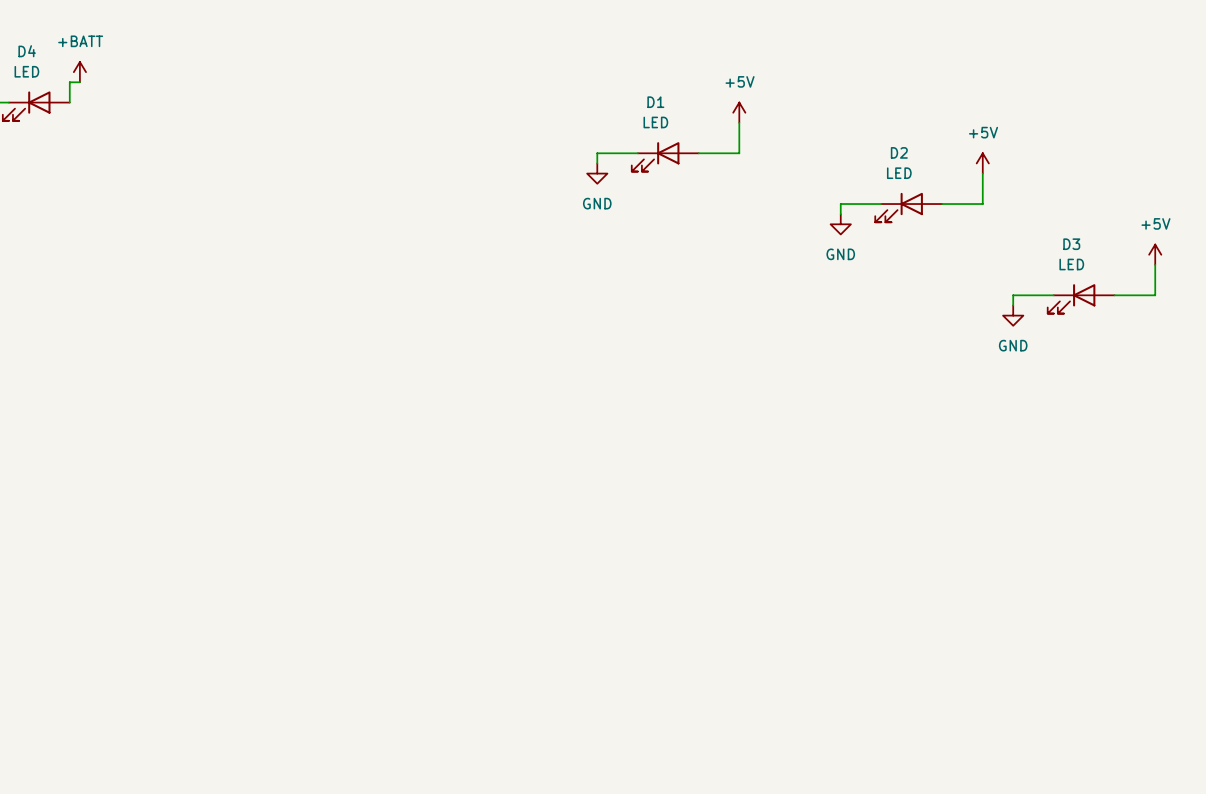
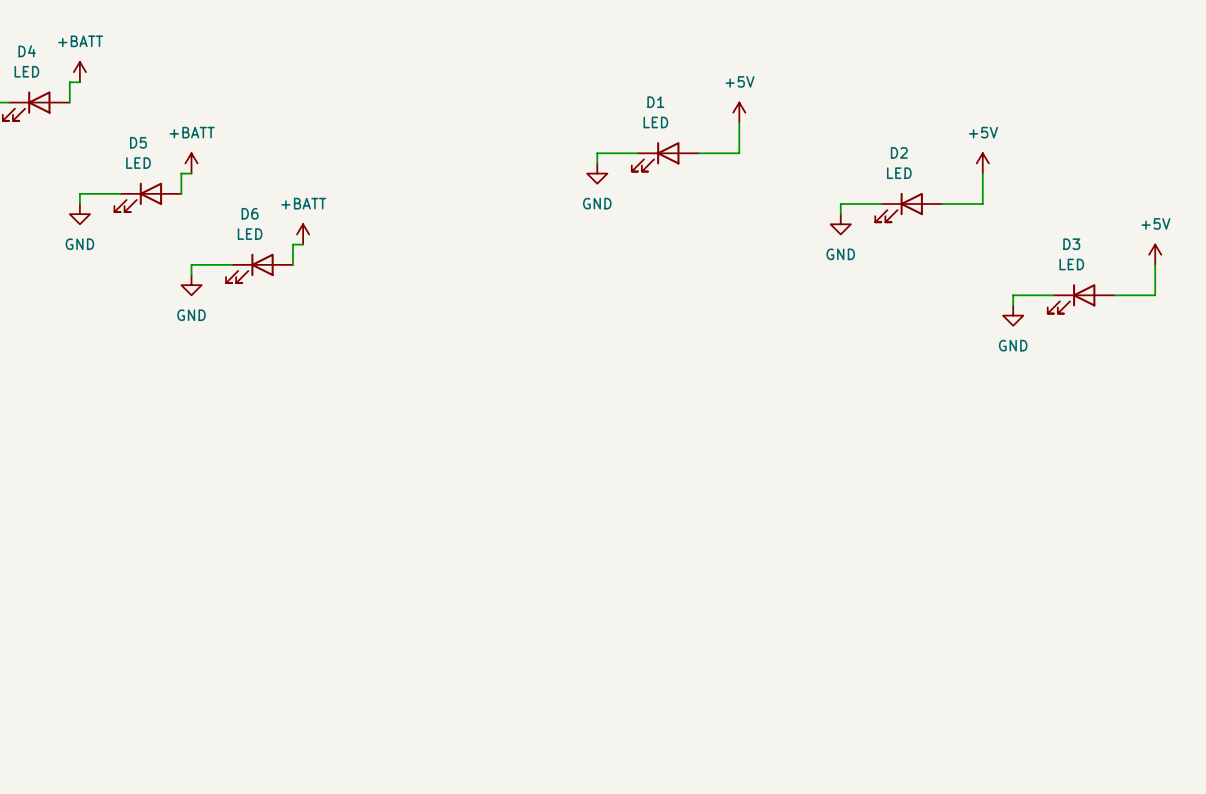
power symbol: none -> +BATT (191, 163)
wire: none -> (191, 173) (181, 173) (181, 193)
wire: none -> (120, 193) (79, 193) (79, 204)
D5: none -> LED (147, 197)
power symbol: none -> GND (79, 214)
power symbol: none -> +BATT (303, 234)
wire: none -> (303, 244) (292, 244) (292, 264)
wire: none -> (232, 264) (191, 264) (191, 275)
D6: none -> LED (259, 268)
power symbol: none -> GND (191, 285)

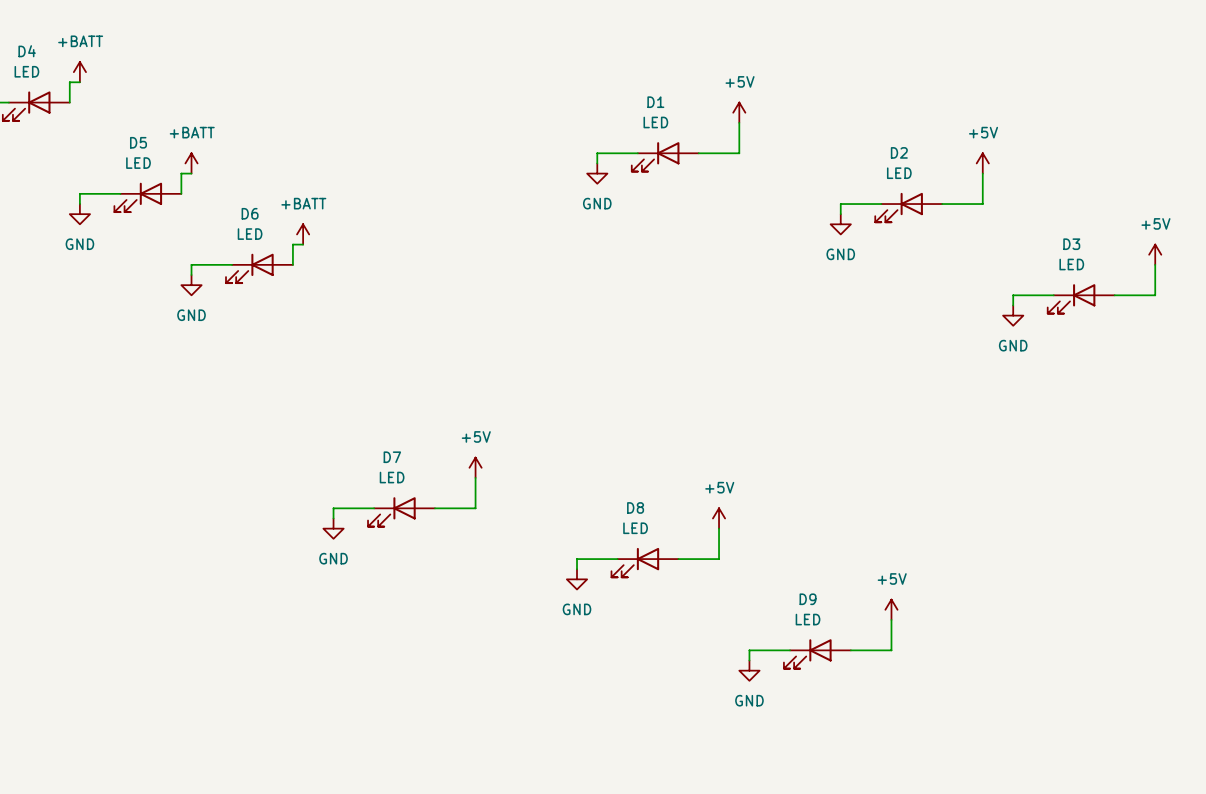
power symbol: none -> +5V (475, 467)
wire: none -> (475, 477) (475, 508) (434, 508)
wire: none -> (374, 508) (333, 508) (333, 518)
D7: none -> LED (401, 511)
power symbol: none -> +5V (719, 518)
power symbol: none -> GND (333, 528)
wire: none -> (719, 528) (719, 559) (678, 559)
wire: none -> (617, 559) (577, 559) (577, 569)
D8: none -> LED (644, 562)
power symbol: none -> GND (577, 579)
power symbol: none -> +5V (891, 609)
wire: none -> (891, 619) (891, 650) (850, 650)
wire: none -> (790, 650) (749, 650) (749, 660)
D9: none -> LED (817, 653)
power symbol: none -> GND (749, 670)

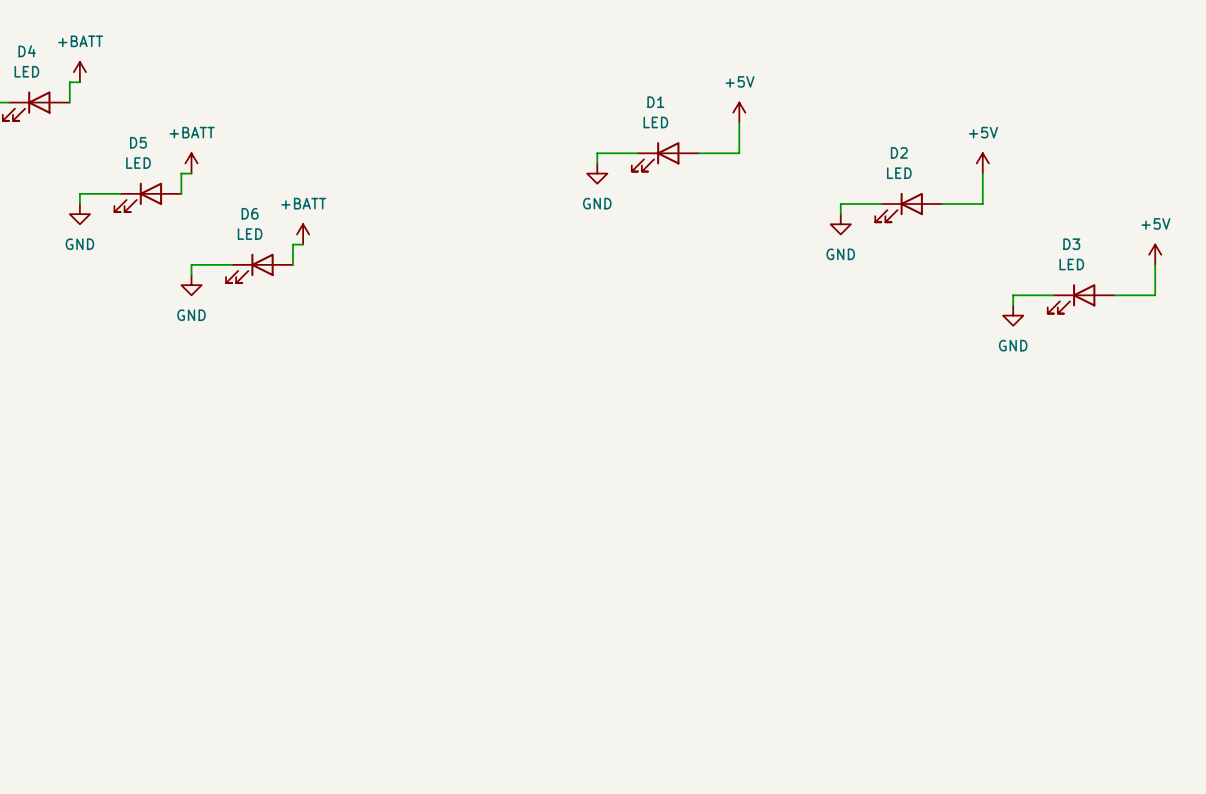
power symbol: +5V (475, 467) -> none
wire: (475, 477) (475, 508) (434, 508) -> none
wire: (374, 508) (333, 508) (333, 518) -> none
D7: LED (401, 511) -> none
power symbol: +5V (719, 518) -> none
power symbol: GND (333, 528) -> none
wire: (719, 528) (719, 559) (678, 559) -> none
wire: (617, 559) (577, 559) (577, 569) -> none
D8: LED (644, 562) -> none
power symbol: GND (577, 579) -> none
power symbol: +5V (891, 609) -> none
wire: (891, 619) (891, 650) (850, 650) -> none
wire: (790, 650) (749, 650) (749, 660) -> none
D9: LED (817, 653) -> none
power symbol: GND (749, 670) -> none

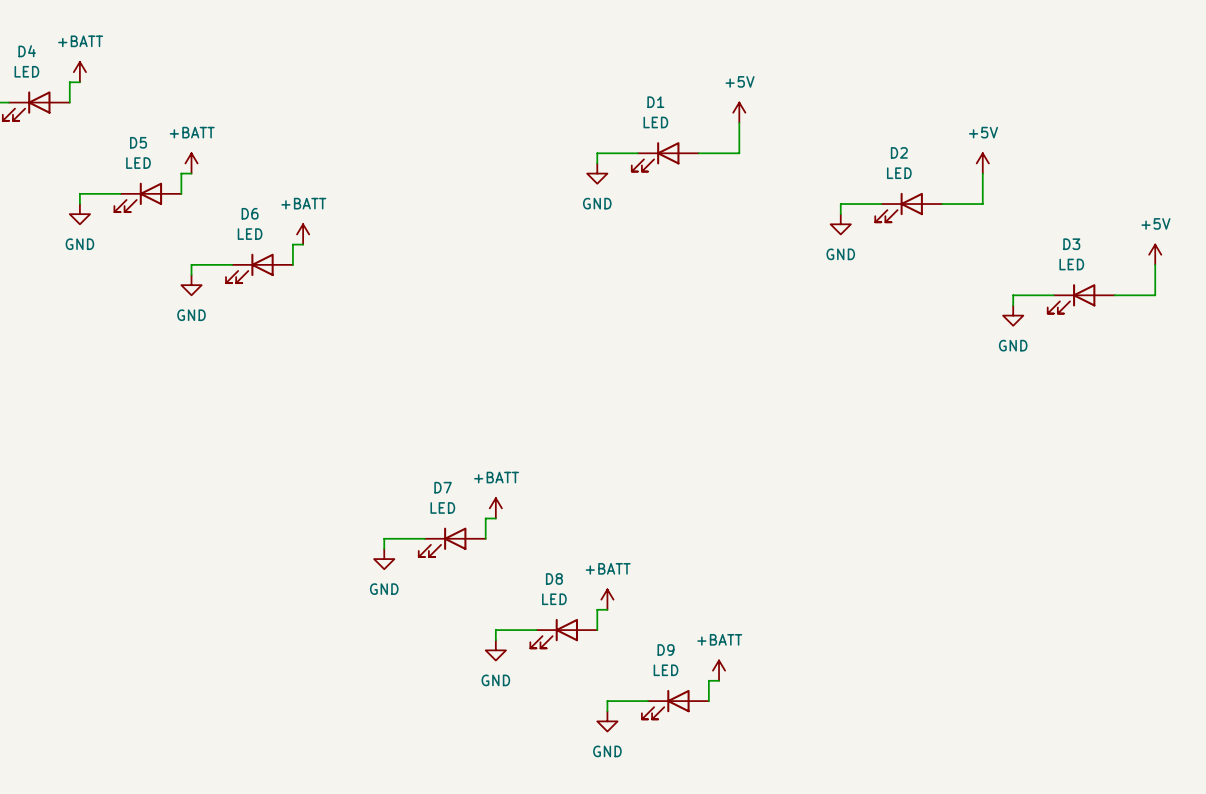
power symbol: none -> +BATT (495, 508)
wire: none -> (495, 518) (485, 518) (485, 538)
wire: none -> (424, 538) (384, 538) (384, 548)
D7: none -> LED (452, 542)
power symbol: none -> GND (384, 559)
power symbol: none -> +BATT (607, 599)
wire: none -> (607, 609) (597, 609) (597, 630)
wire: none -> (536, 630) (495, 630) (495, 640)
D8: none -> LED (563, 633)
power symbol: none -> GND (495, 650)
power symbol: none -> +BATT (719, 670)
wire: none -> (719, 680) (708, 680) (708, 701)
wire: none -> (648, 701) (607, 701) (607, 711)
D9: none -> LED (675, 704)
power symbol: none -> GND (607, 721)

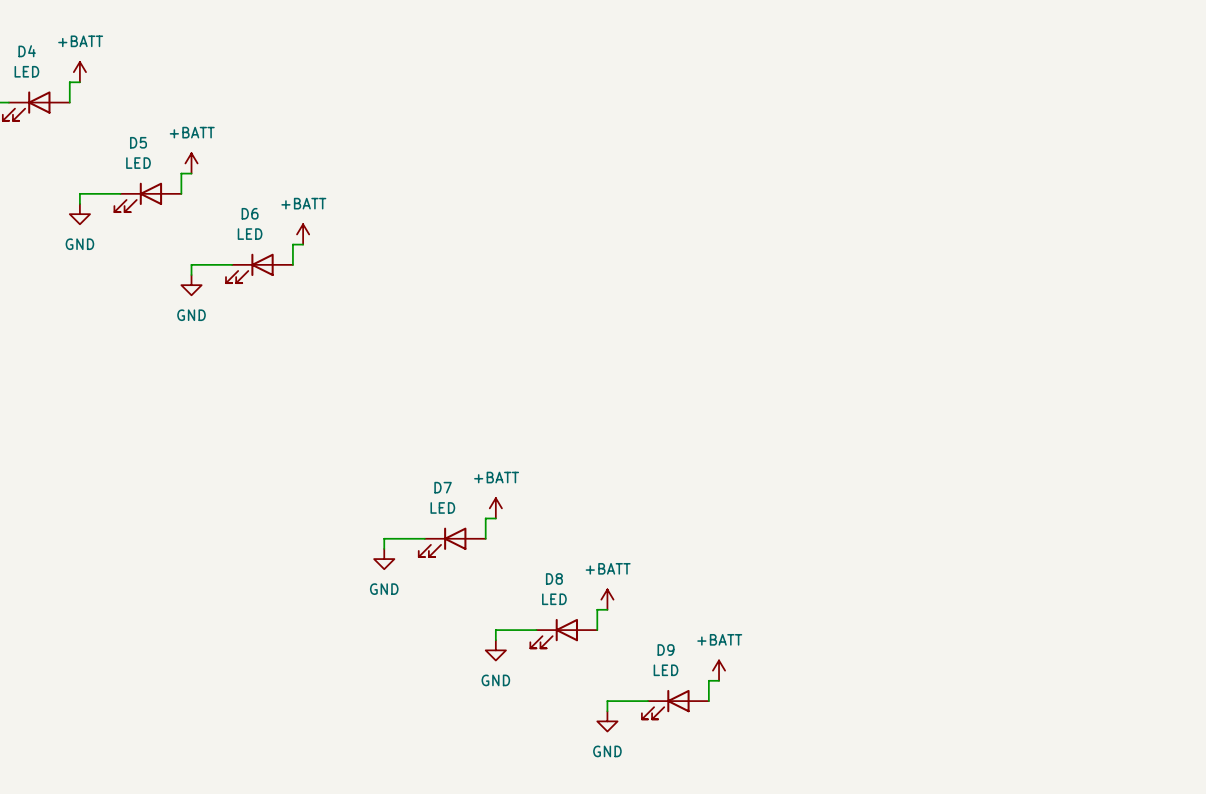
power symbol: +5V (739, 112) -> none
wire: (739, 122) (739, 153) (698, 153) -> none
wire: (637, 153) (597, 153) (597, 163) -> none
D1: LED (665, 156) -> none
power symbol: +5V (982, 163) -> none
power symbol: GND (597, 173) -> none
wire: (982, 173) (982, 204) (942, 204) -> none
wire: (881, 204) (840, 204) (840, 214) -> none
D2: LED (908, 207) -> none
power symbol: GND (840, 224) -> none
power symbol: +5V (1155, 254) -> none
wire: (1155, 264) (1155, 295) (1114, 295) -> none
wire: (1053, 295) (1013, 295) (1013, 305) -> none
D3: LED (1081, 298) -> none
power symbol: GND (1013, 315) -> none

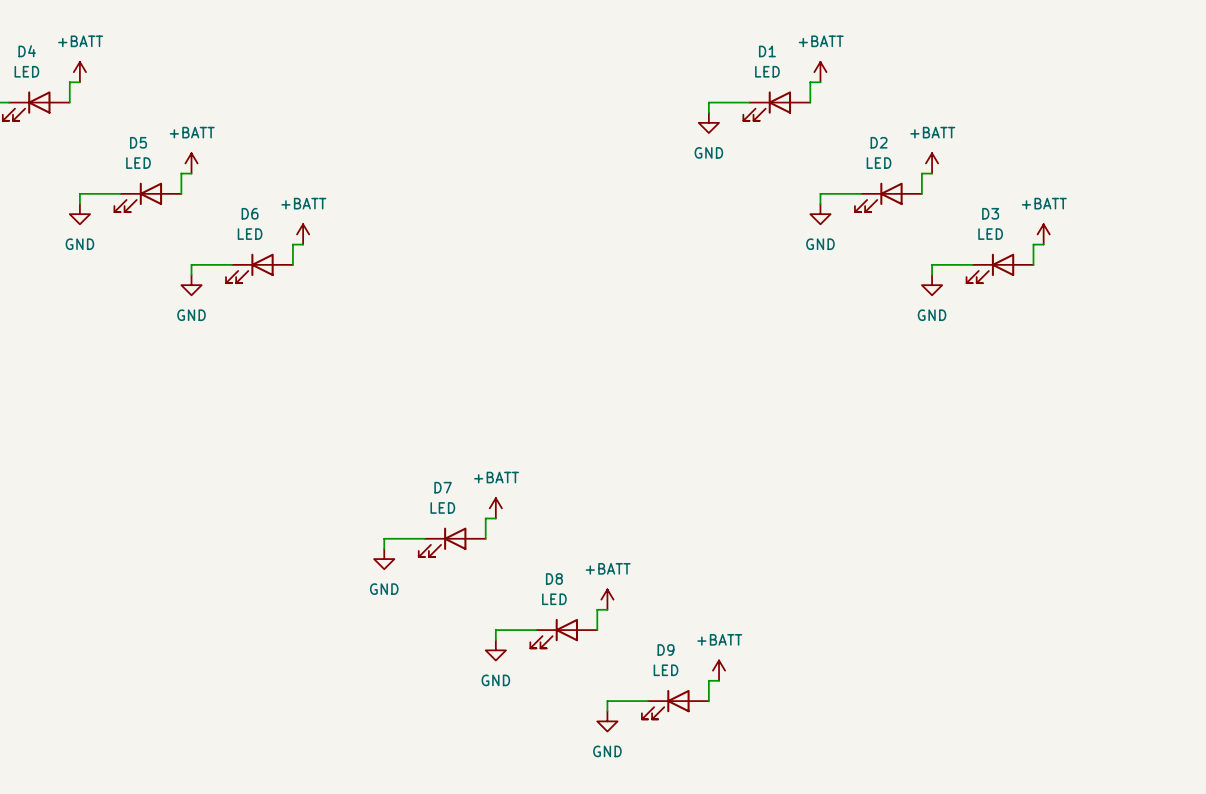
power symbol: none -> +BATT (820, 72)
wire: none -> (820, 82) (810, 82) (810, 102)
wire: none -> (749, 102) (708, 102) (708, 112)
D1: none -> LED (776, 106)
power symbol: none -> GND (708, 122)
power symbol: none -> +BATT (932, 163)
wire: none -> (932, 173) (921, 173) (921, 193)
wire: none -> (861, 193) (820, 193) (820, 204)
D2: none -> LED (888, 197)
power symbol: none -> GND (820, 214)
power symbol: none -> +BATT (1043, 234)
wire: none -> (1043, 244) (1033, 244) (1033, 264)
wire: none -> (972, 264) (932, 264) (932, 275)
D3: none -> LED (1000, 268)
power symbol: none -> GND (932, 285)

